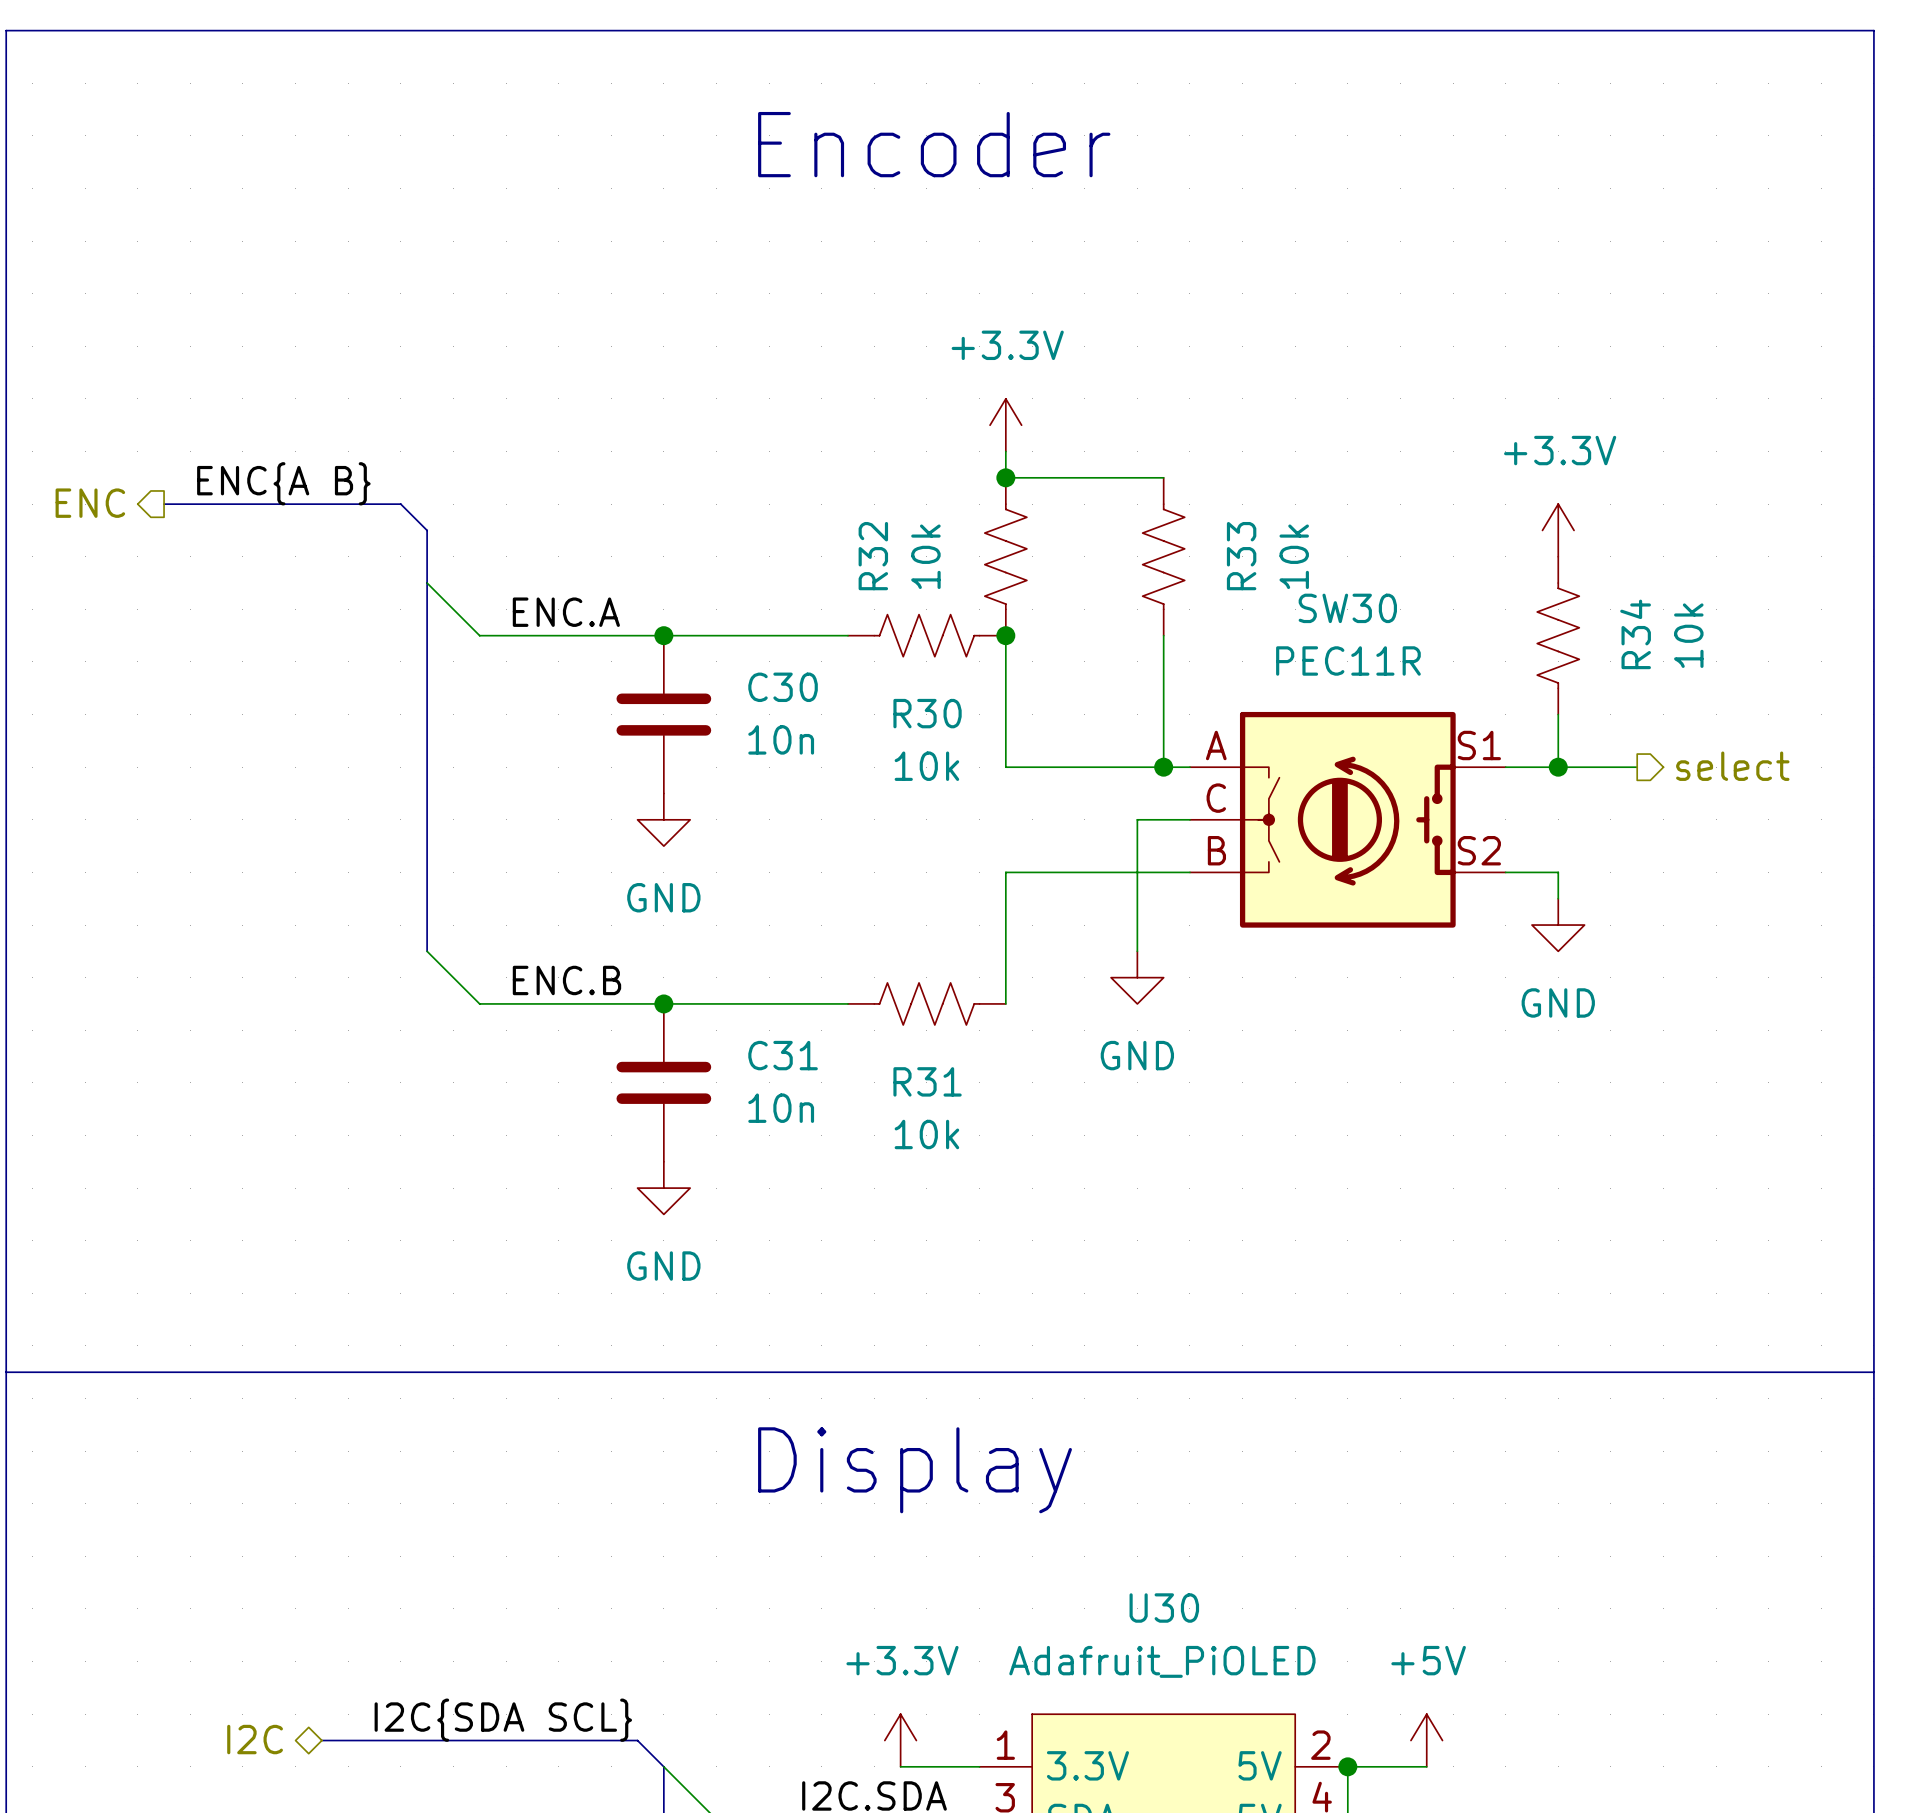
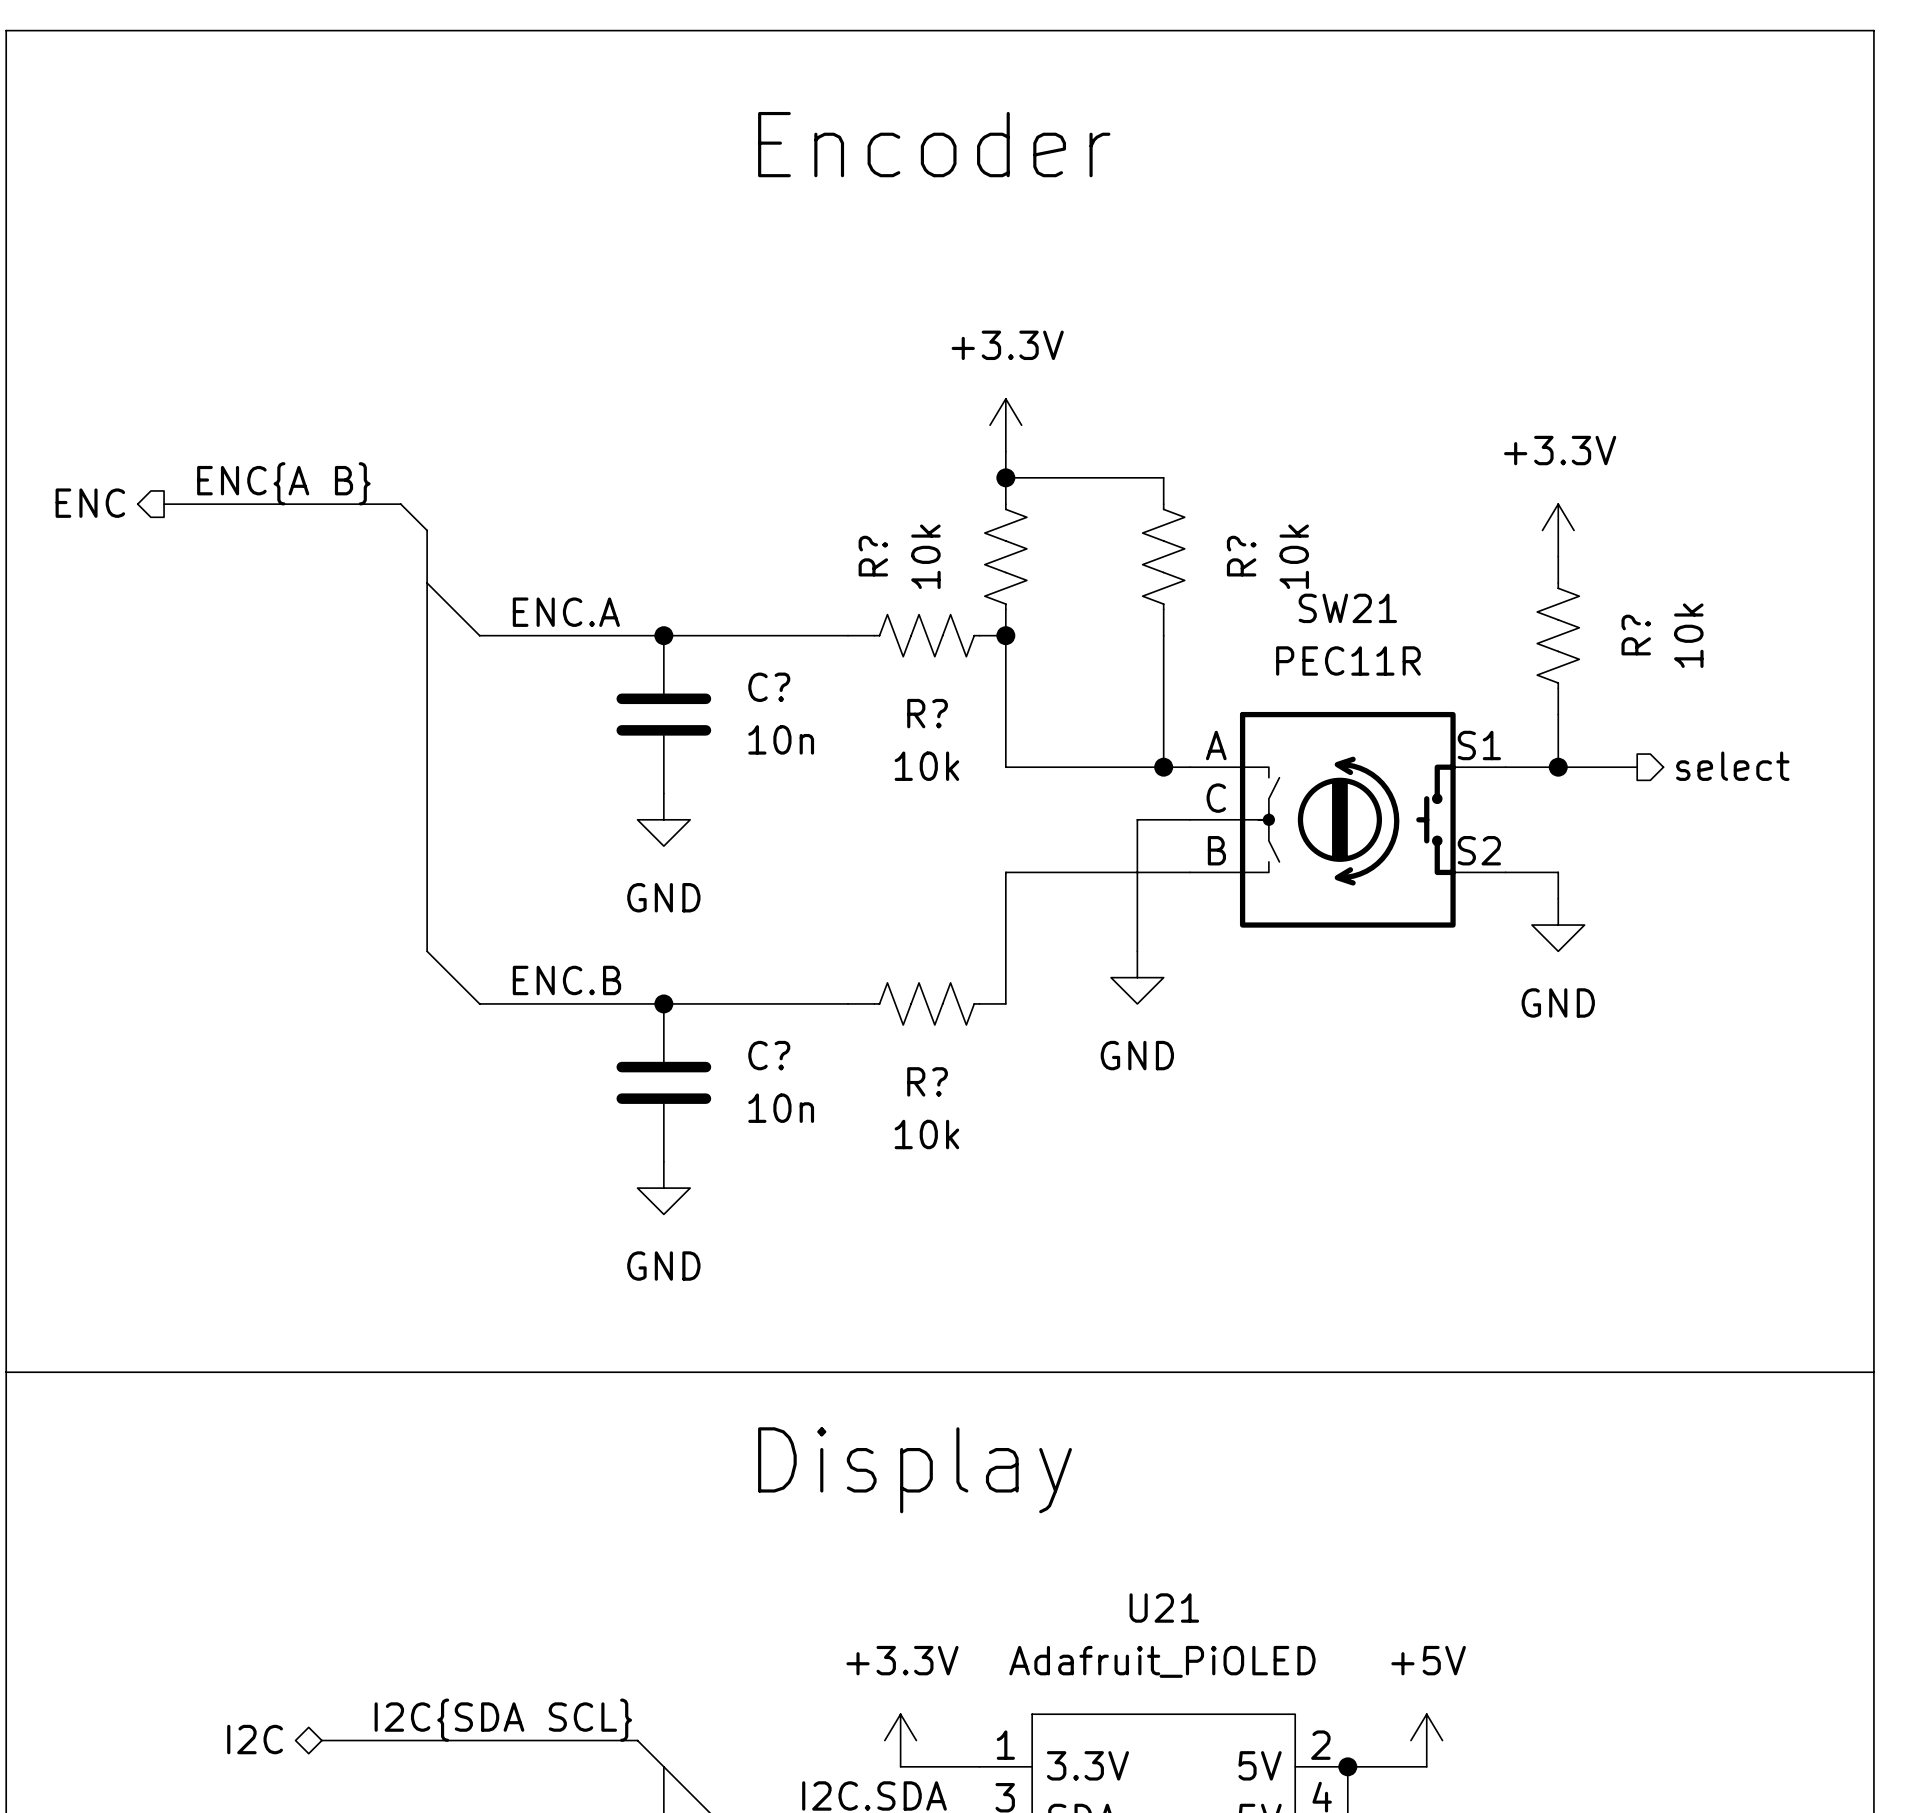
R32 name: R32 (873, 556) -> R? (873, 556)
R33 name: R33 (1241, 556) -> R? (1241, 556)
SW30 name: SW30 (1347, 608) -> SW21 (1347, 608)
R34 name: R34 (1635, 634) -> R? (1636, 635)
C30 name: C30 (783, 687) -> C? (769, 687)
R30 name: R30 (927, 713) -> R? (927, 713)
C31 name: C31 (783, 1055) -> C? (769, 1055)
R31 name: R31 (927, 1081) -> R? (927, 1081)
U30 name: U30 (1164, 1608) -> U21 (1164, 1608)

